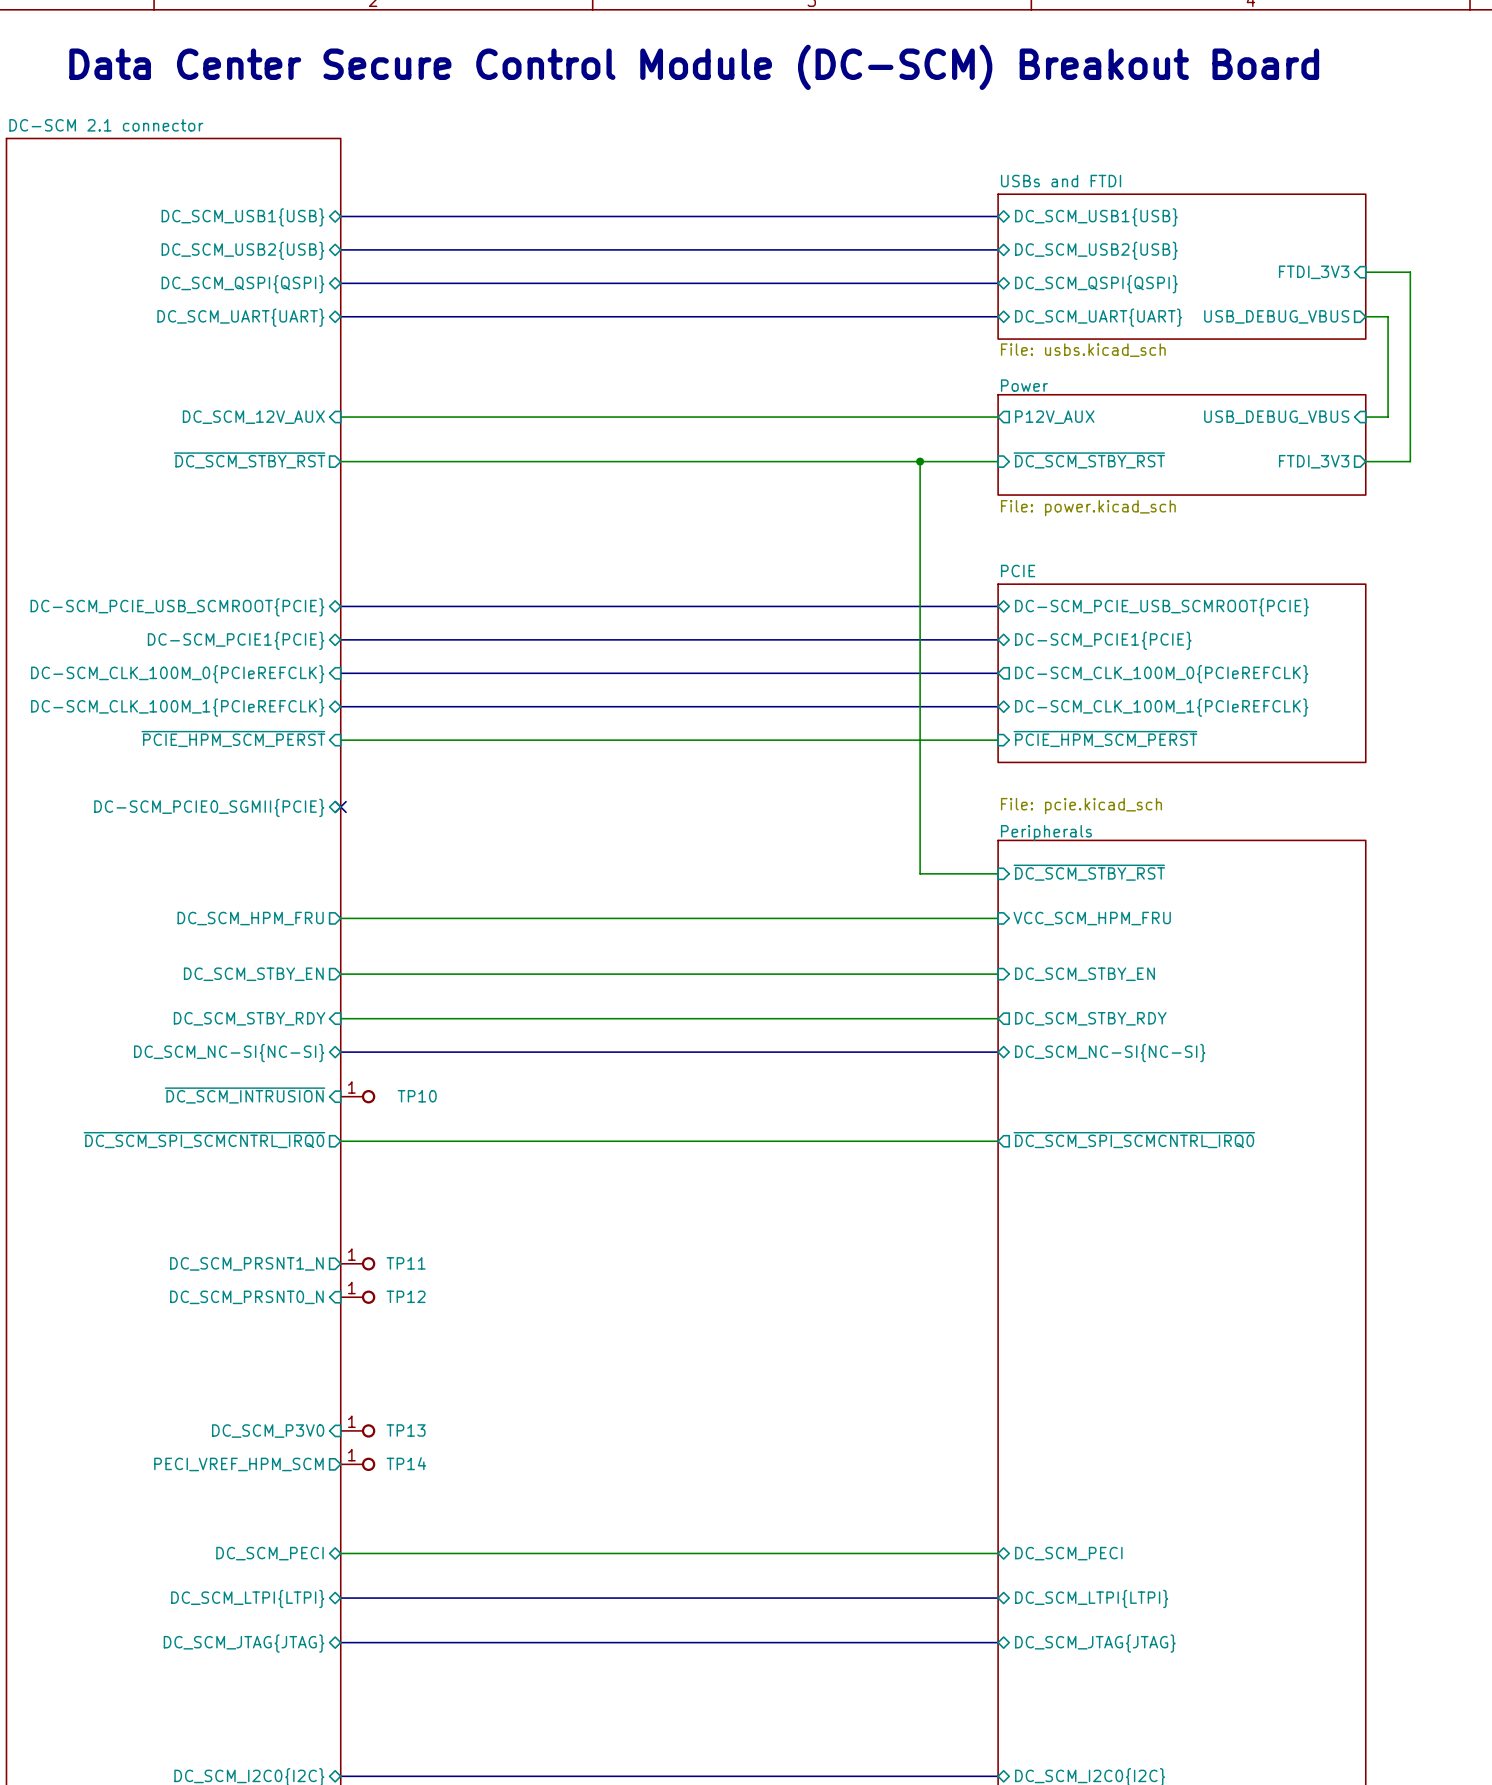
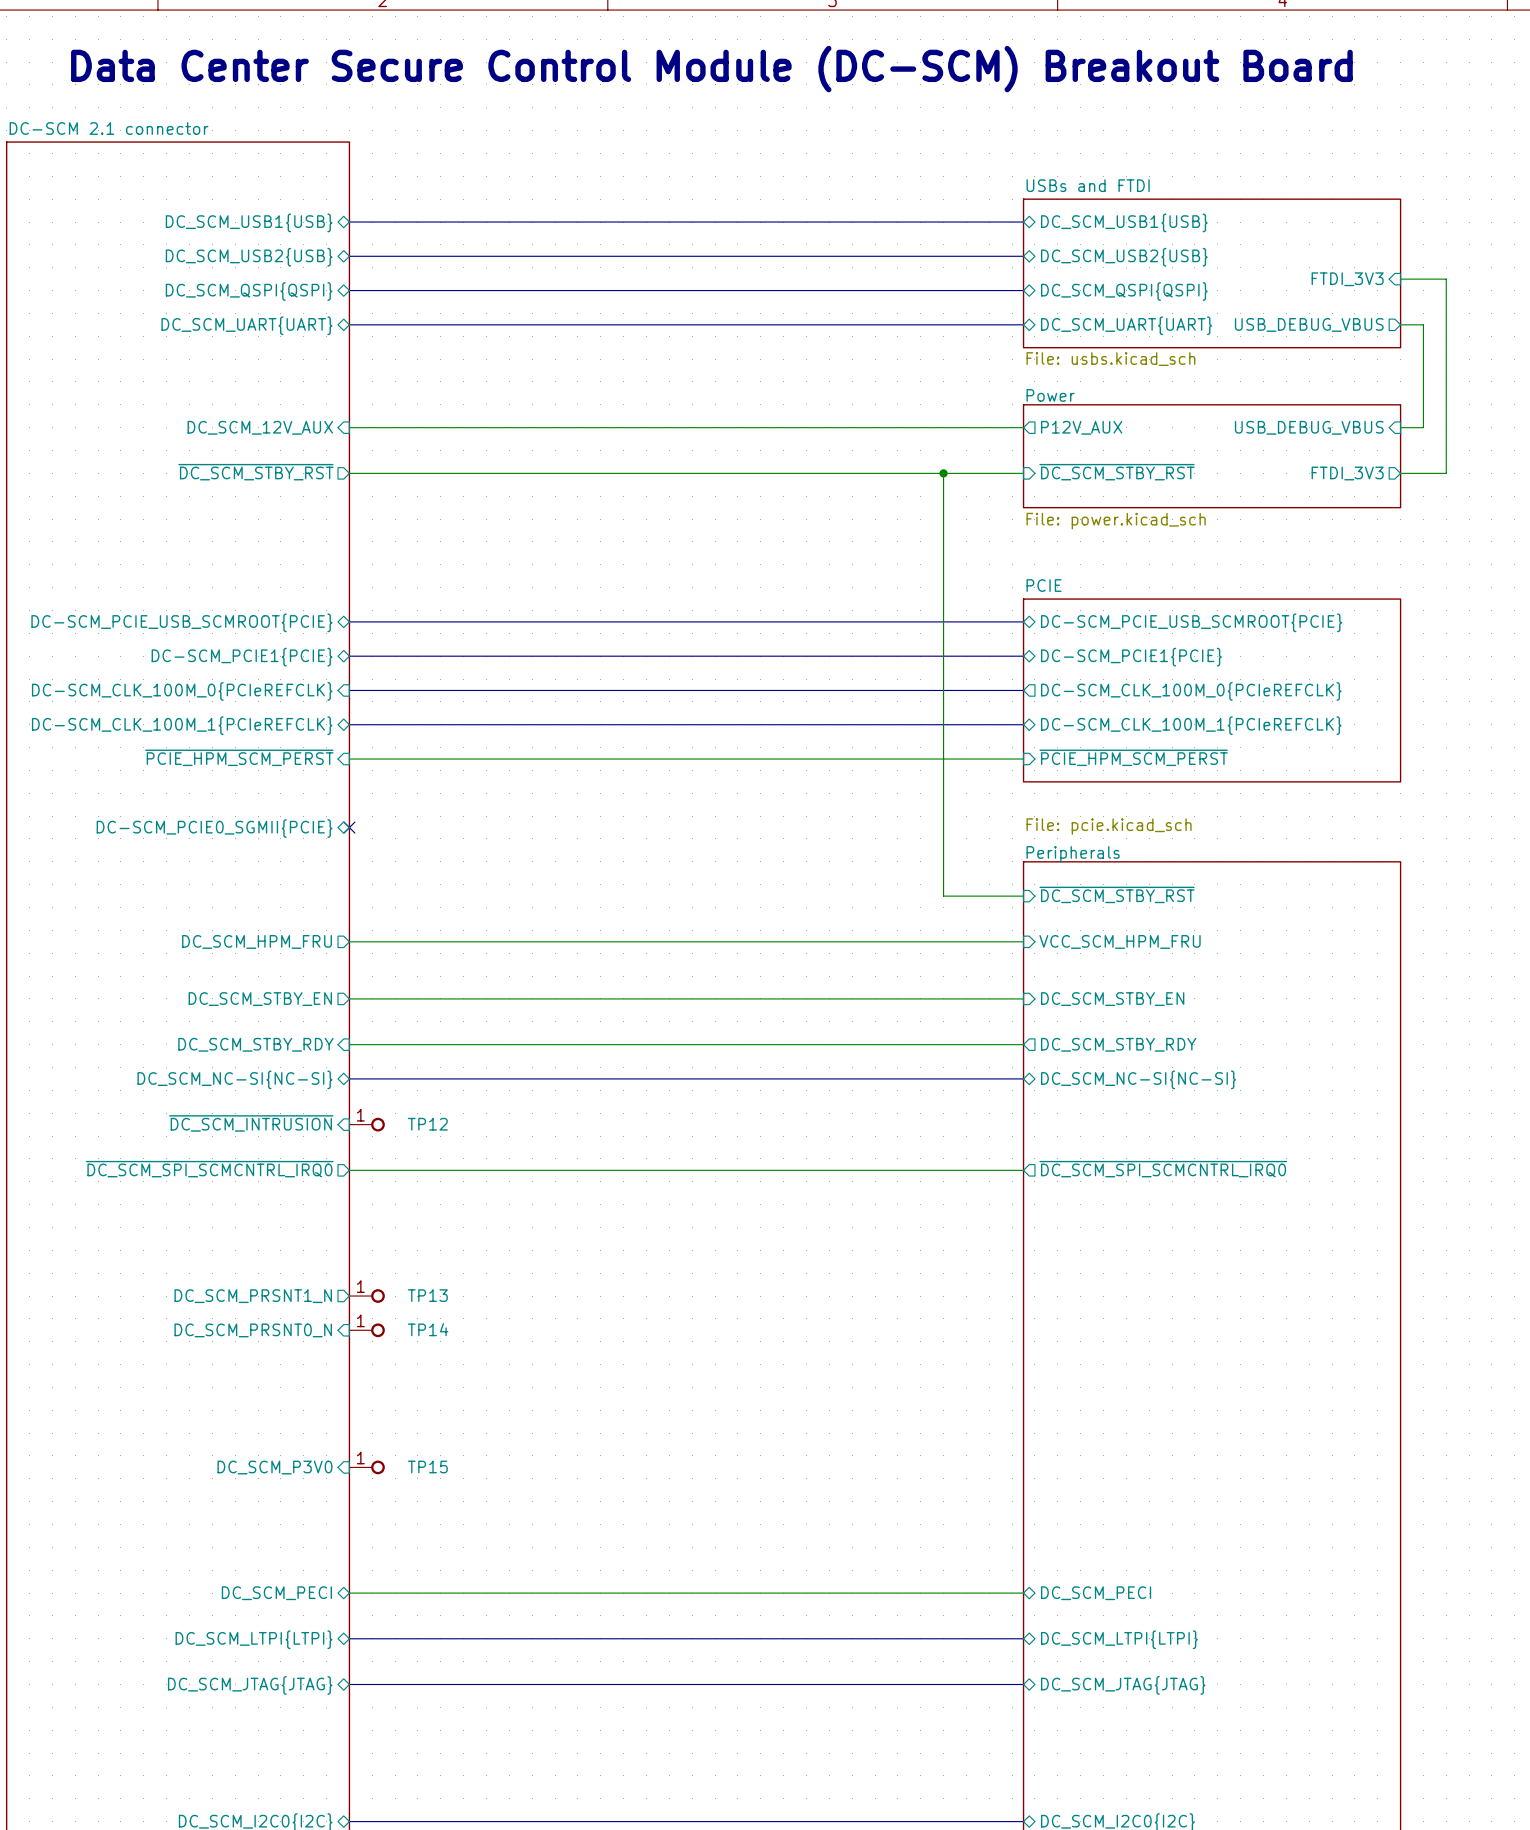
TP10 name: TP10 (417, 1096) -> TP12 (427, 1124)
TP11 name: TP11 (406, 1263) -> TP13 (427, 1295)
TP12 name: TP12 (406, 1296) -> TP14 (428, 1329)
TP13 name: TP13 (406, 1430) -> TP15 (427, 1466)
sheet pin: PECI_VREF_HPM_SCM (238, 1464) -> none
TP14: (358, 1464) -> none

